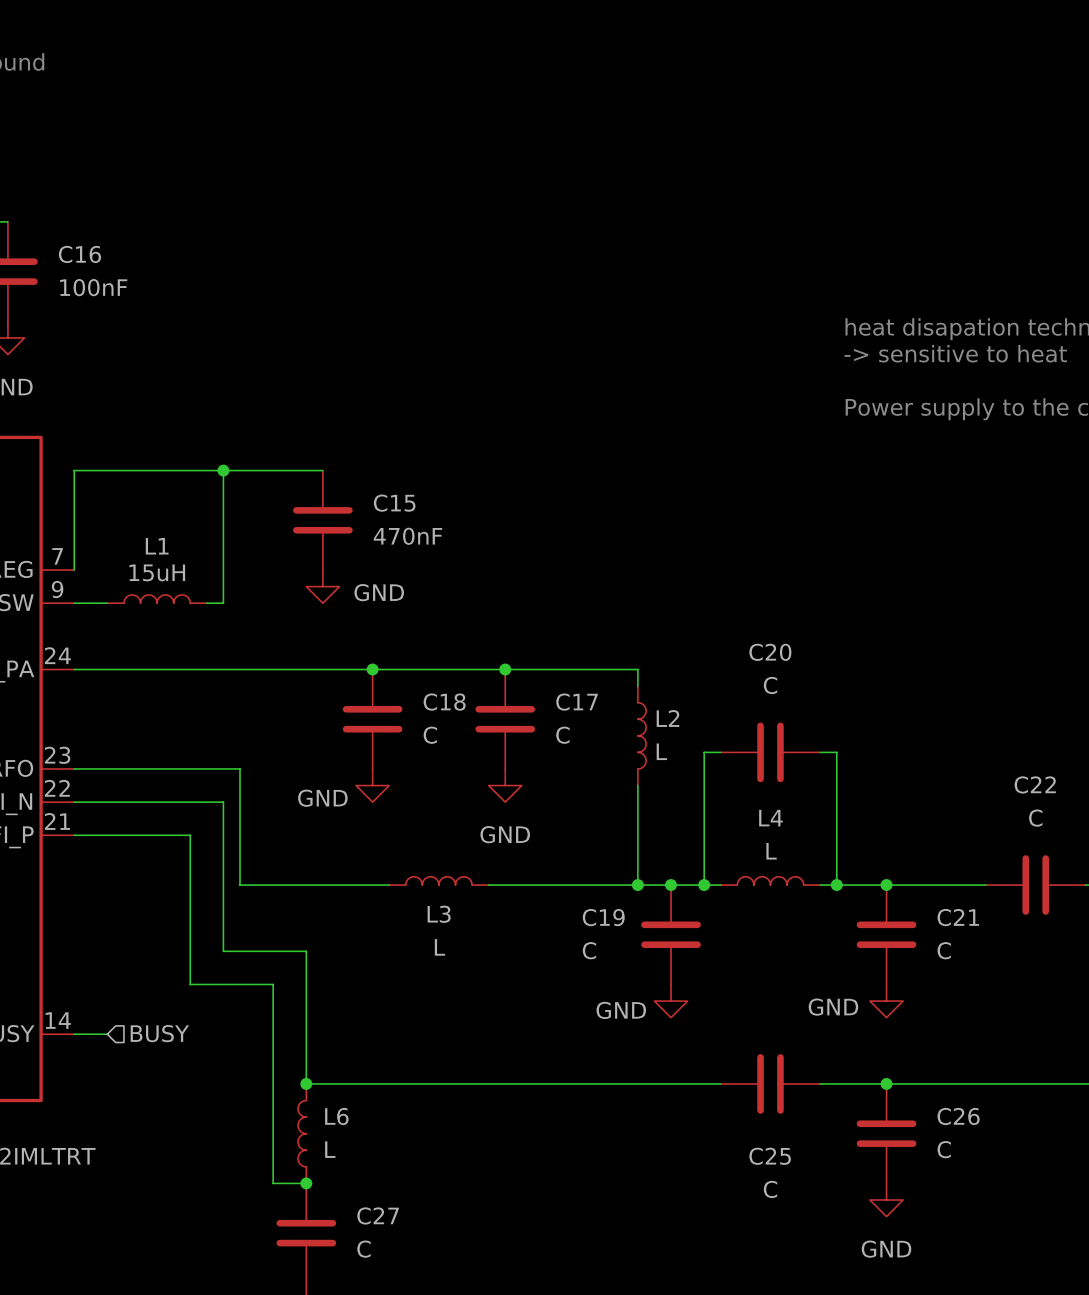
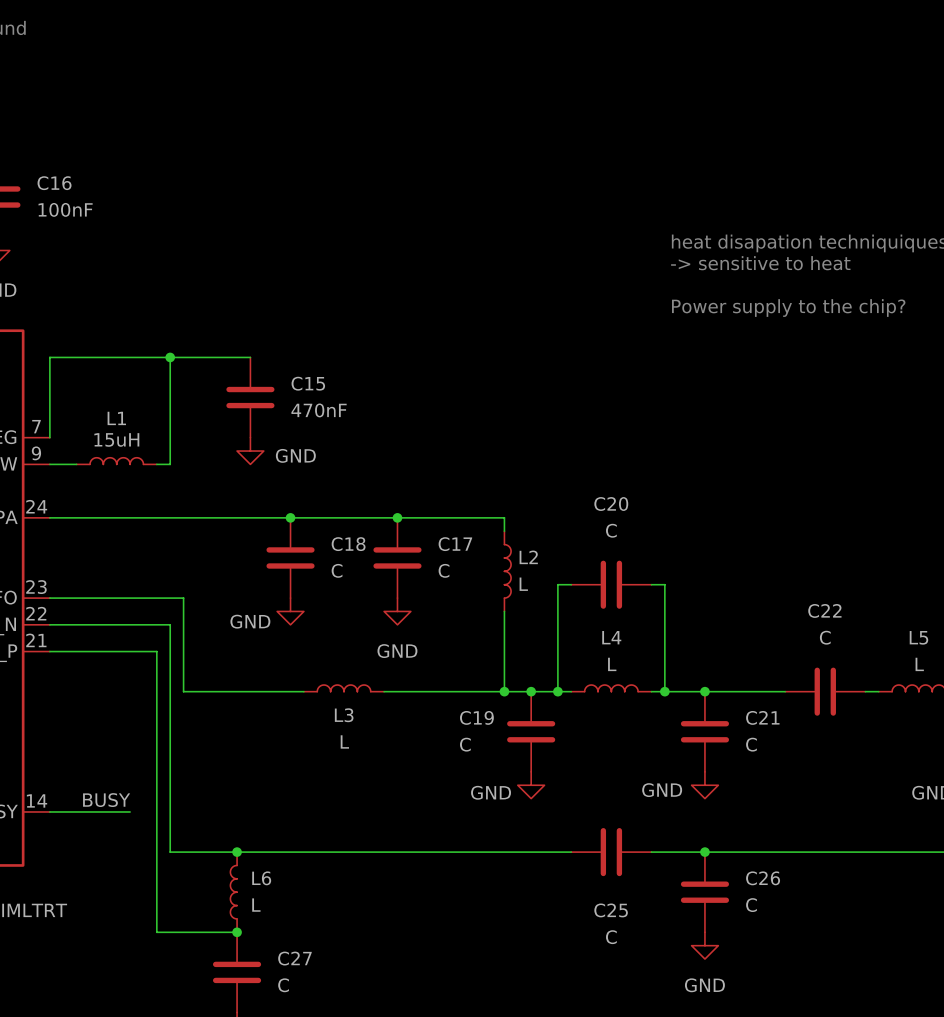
wire: (190, 835) (190, 984) (273, 984) (273, 1183) -> (143, 651) (156, 651) (156, 932) (210, 932)
wire: (223, 951) (306, 951) (306, 1083) -> (170, 745) (170, 852) (237, 852)
label: none -> BUSY (106, 800)
hierarchical label: BUSY (159, 1033) -> none
wire: none -> (76, 811) (130, 811)

